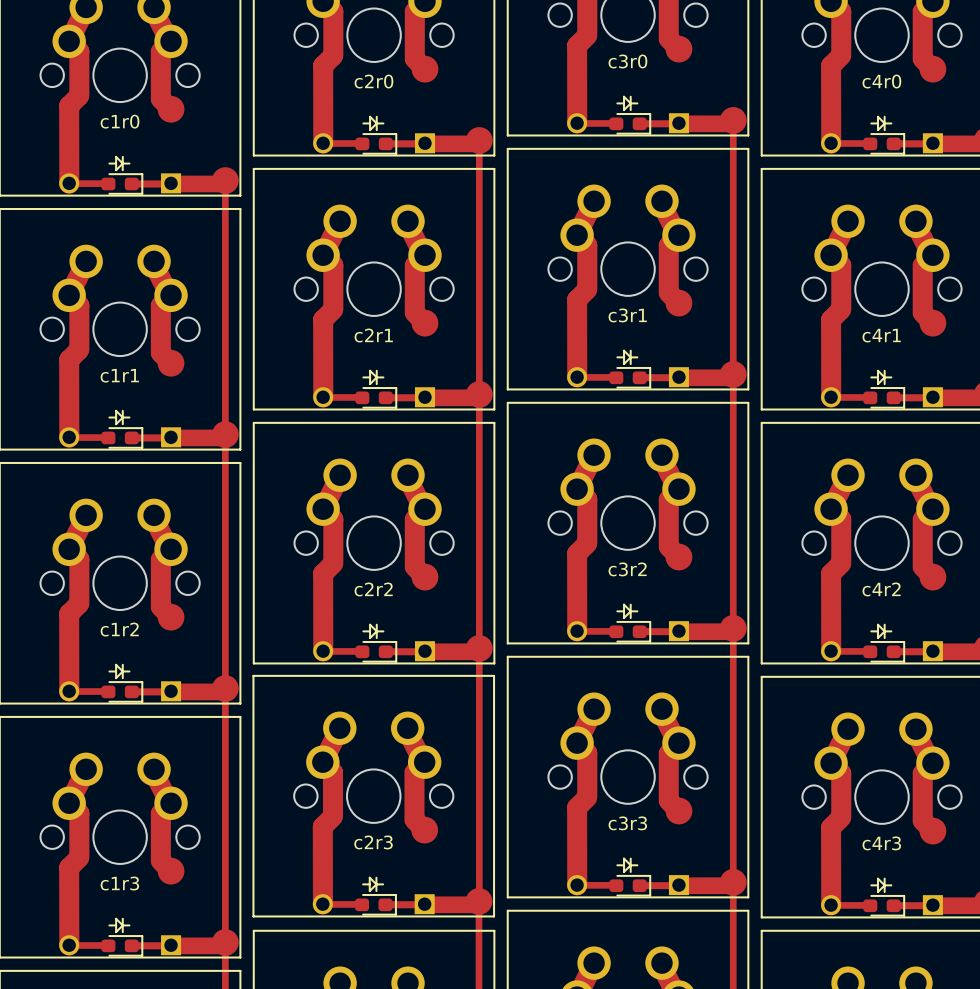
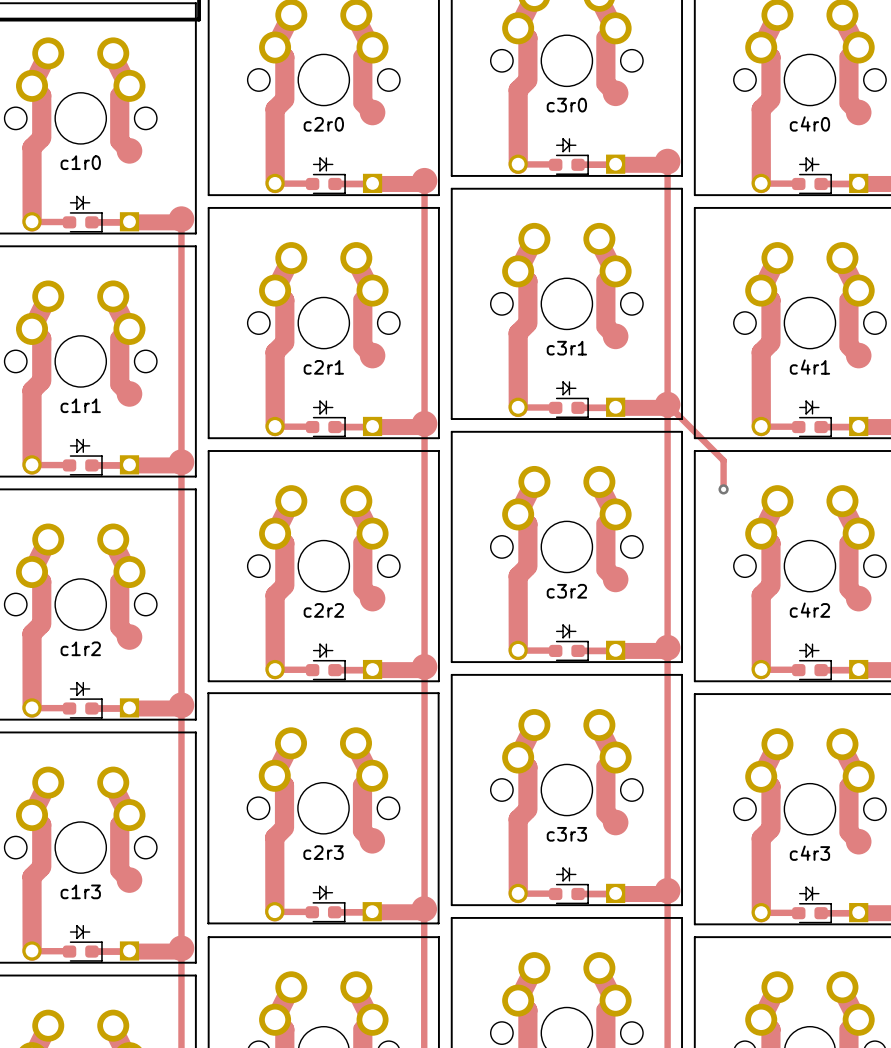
track: none -> (667, 404) (723, 460) (723, 489)
via: none -> (723, 489)

